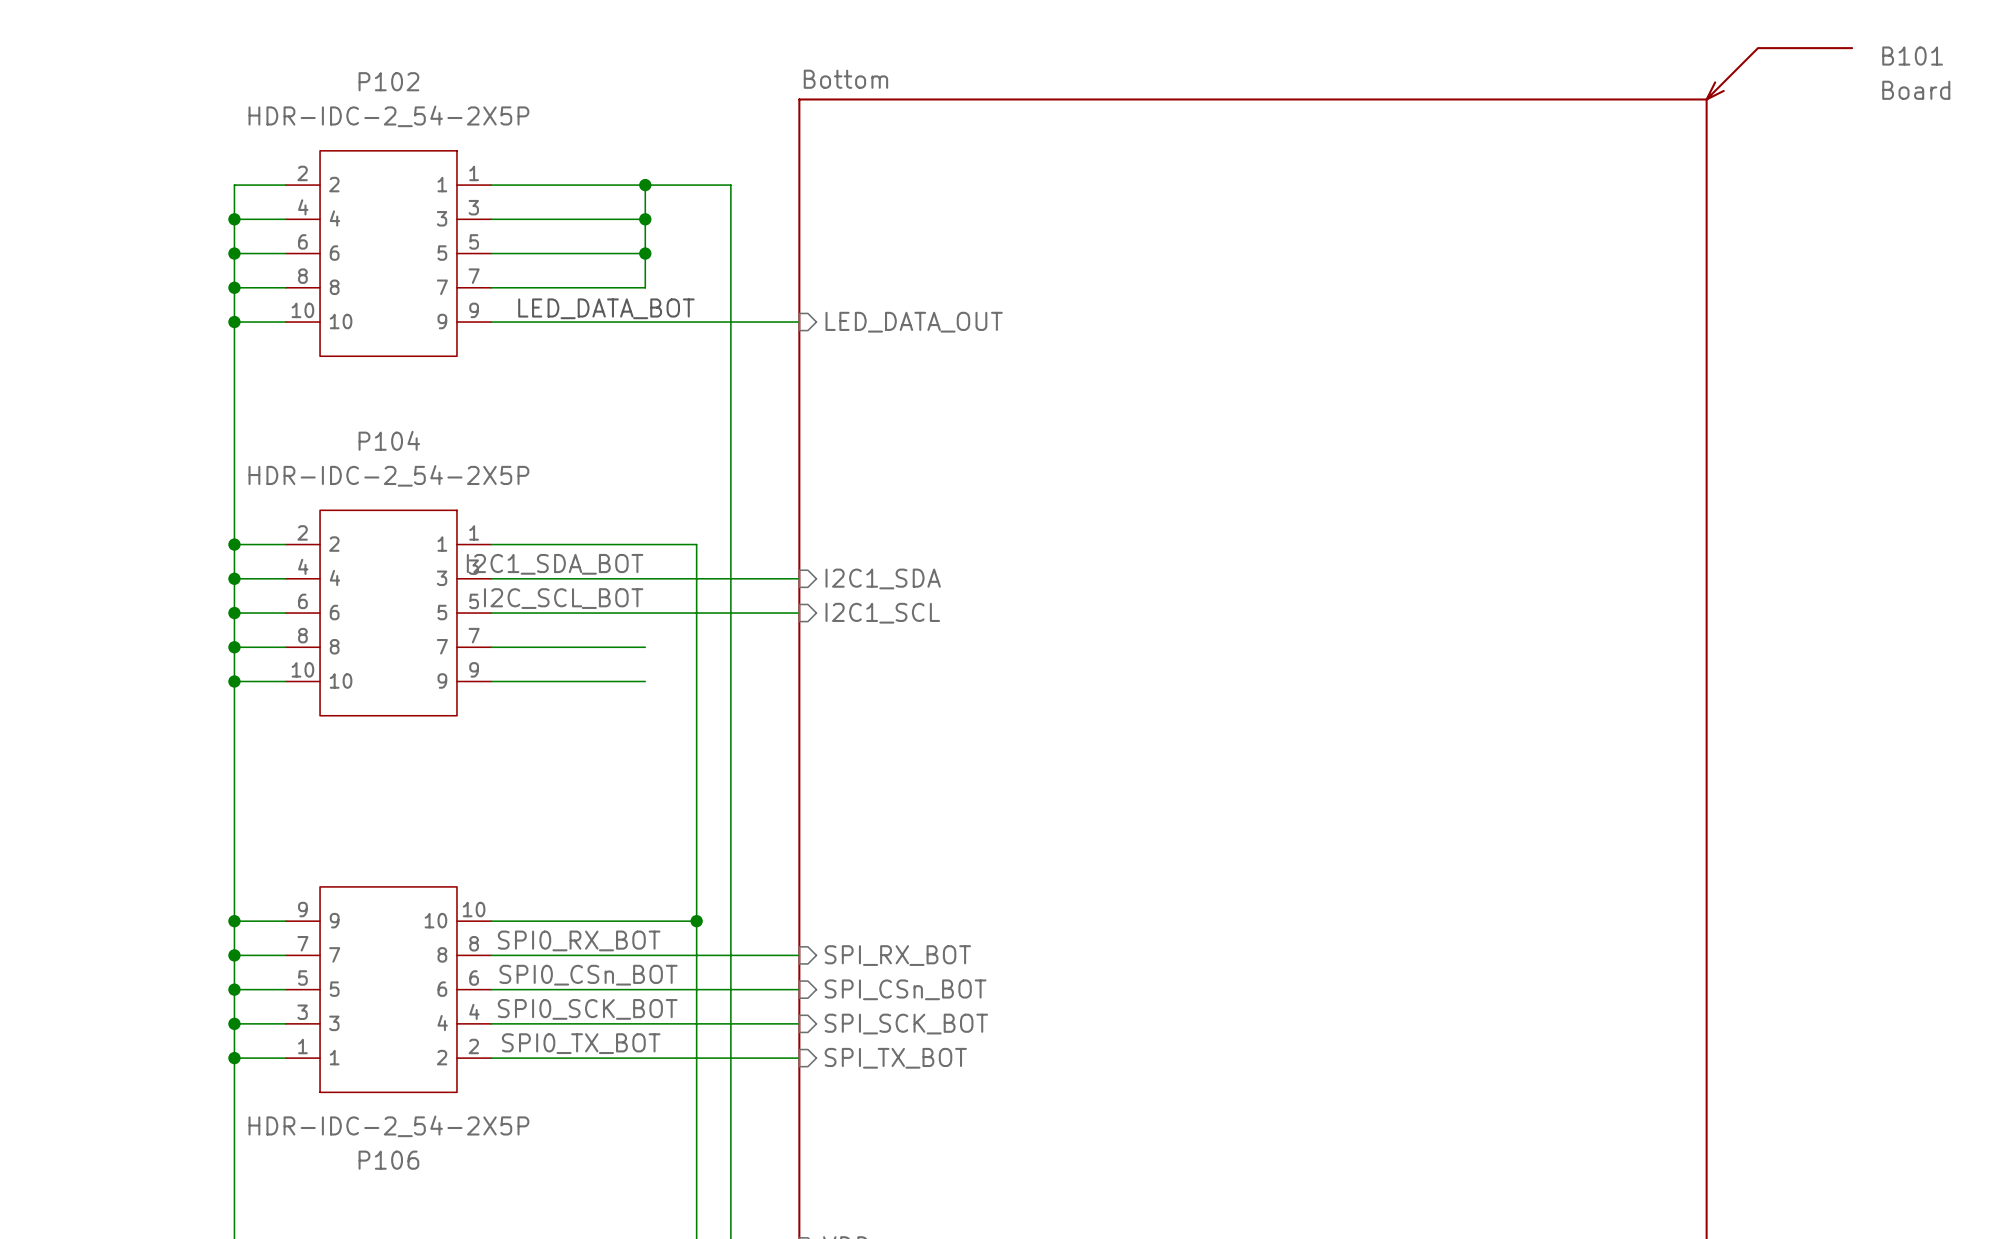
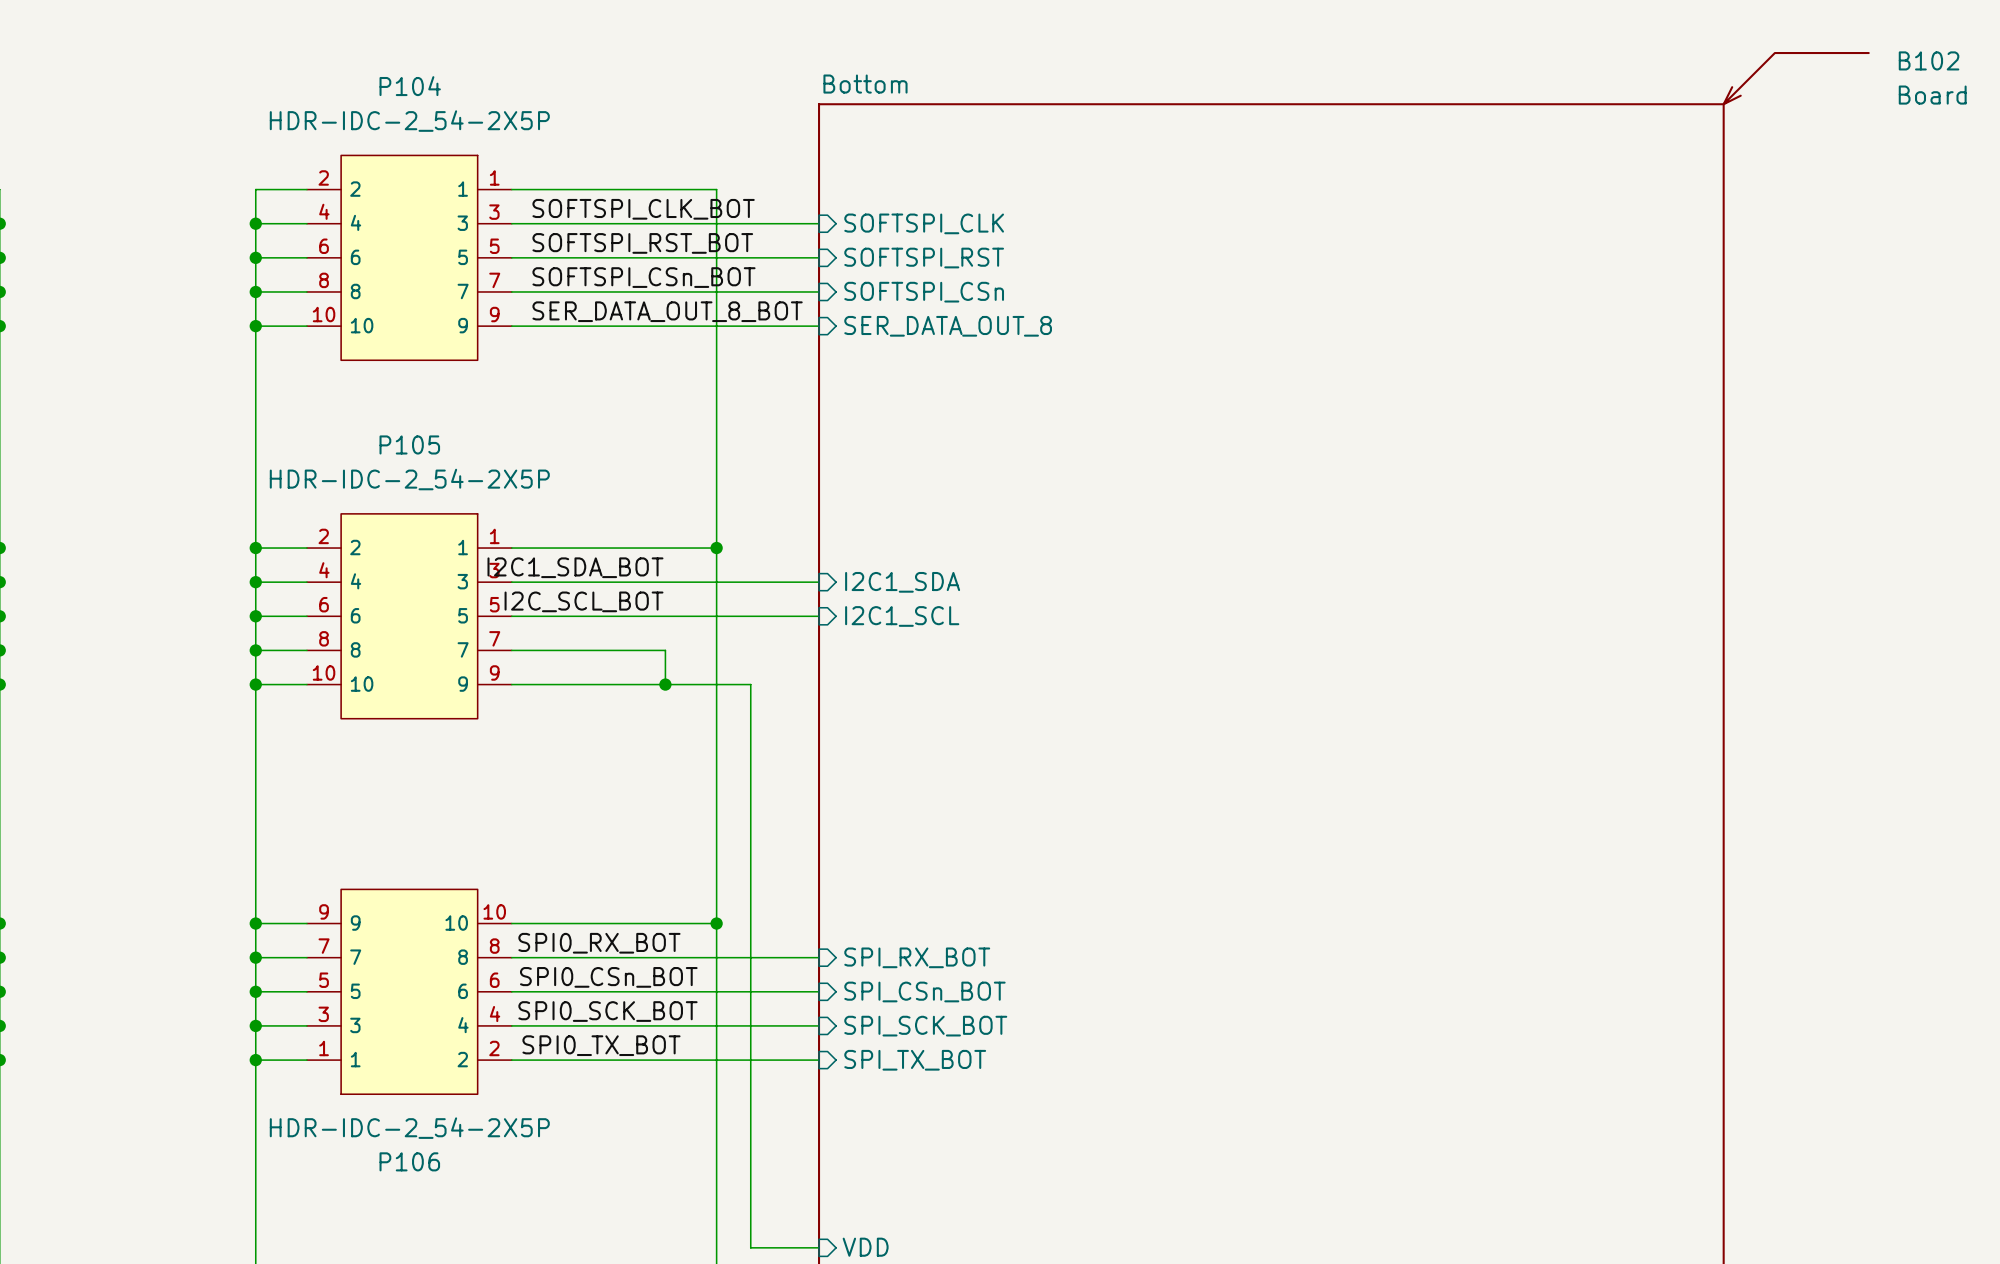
B101 name: B101 (1912, 56) -> B102 (1929, 60)
P102 name: P102 (388, 81) -> P104 (410, 86)
wire: (645, 185) (645, 287) -> (819, 291) (665, 291)
junction: (645, 185) -> none
wire: (696, 185) (730, 185) (730, 681) -> (716, 189) (716, 548)
label: none -> SOFTSPI_CLK_BOT (643, 209)
wire: none -> (665, 223) (819, 223)
junction: (645, 219) -> none
sheet pin: none -> SOFTSPI_CLK (924, 223)
label: none -> SOFTSPI_RST_BOT (642, 243)
wire: none -> (665, 257) (819, 257)
junction: (645, 253) -> none
sheet pin: none -> SOFTSPI_RST (924, 258)
label: none -> SOFTSPI_CSn_BOT (644, 277)
sheet pin: none -> SOFTSPI_CSn (924, 292)
label: none -> SER_DATA_OUT_8_BOT (667, 311)
text: LED_DATA_BOT (606, 308) -> none
sheet pin: LED_DATA_OUT (914, 322) -> SER_DATA_OUT_8 (948, 326)
P104 name: P104 (389, 440) -> P105 (409, 444)
junction: none -> (716, 548)
wire: none -> (665, 650) (665, 684) (750, 684)
junction: none -> (665, 684)

